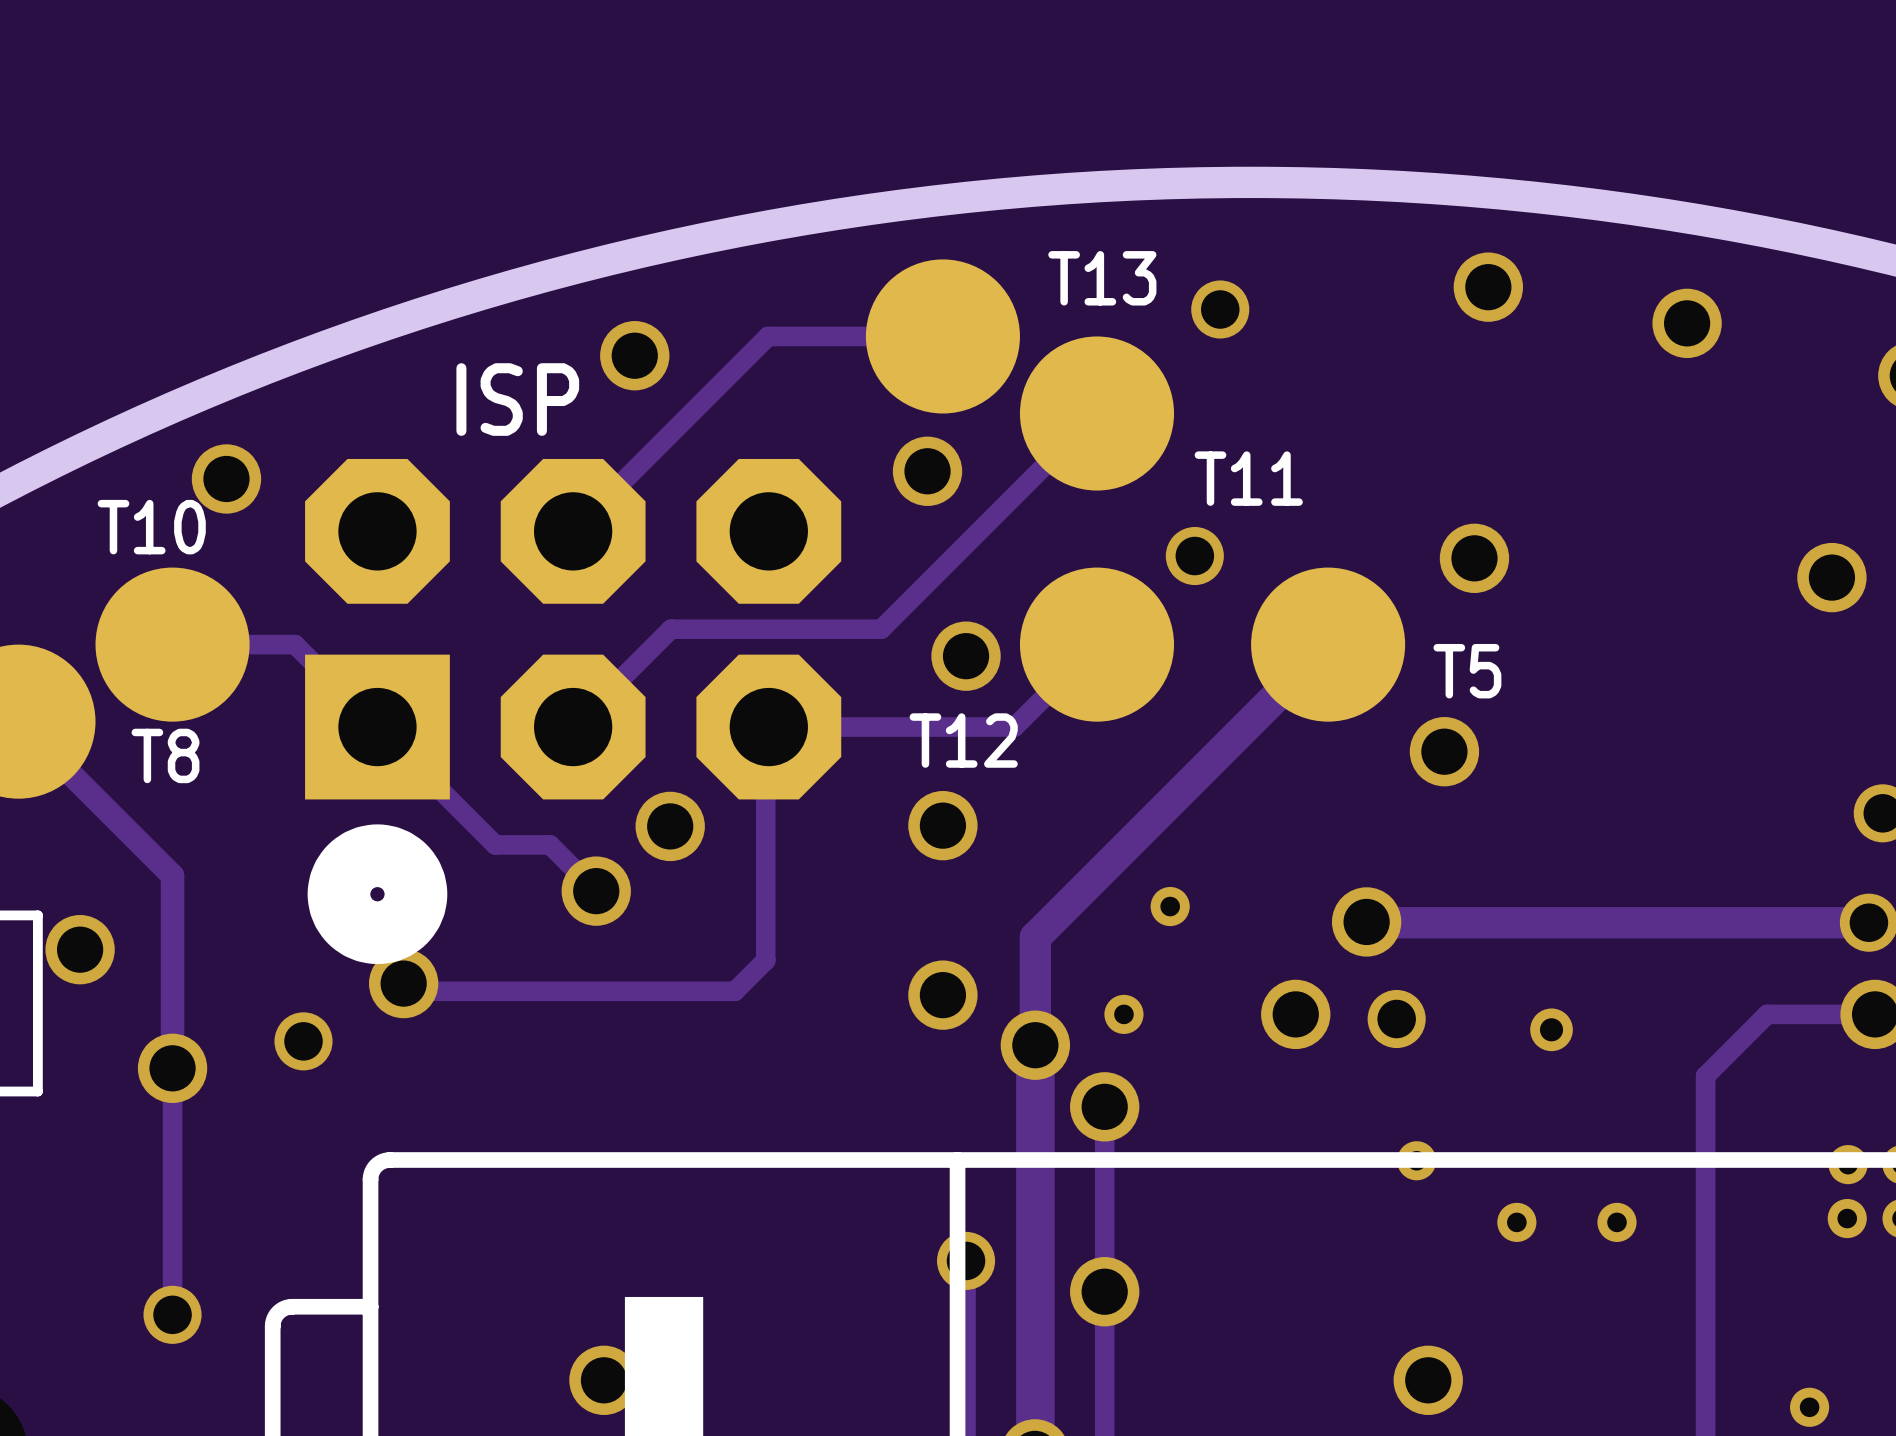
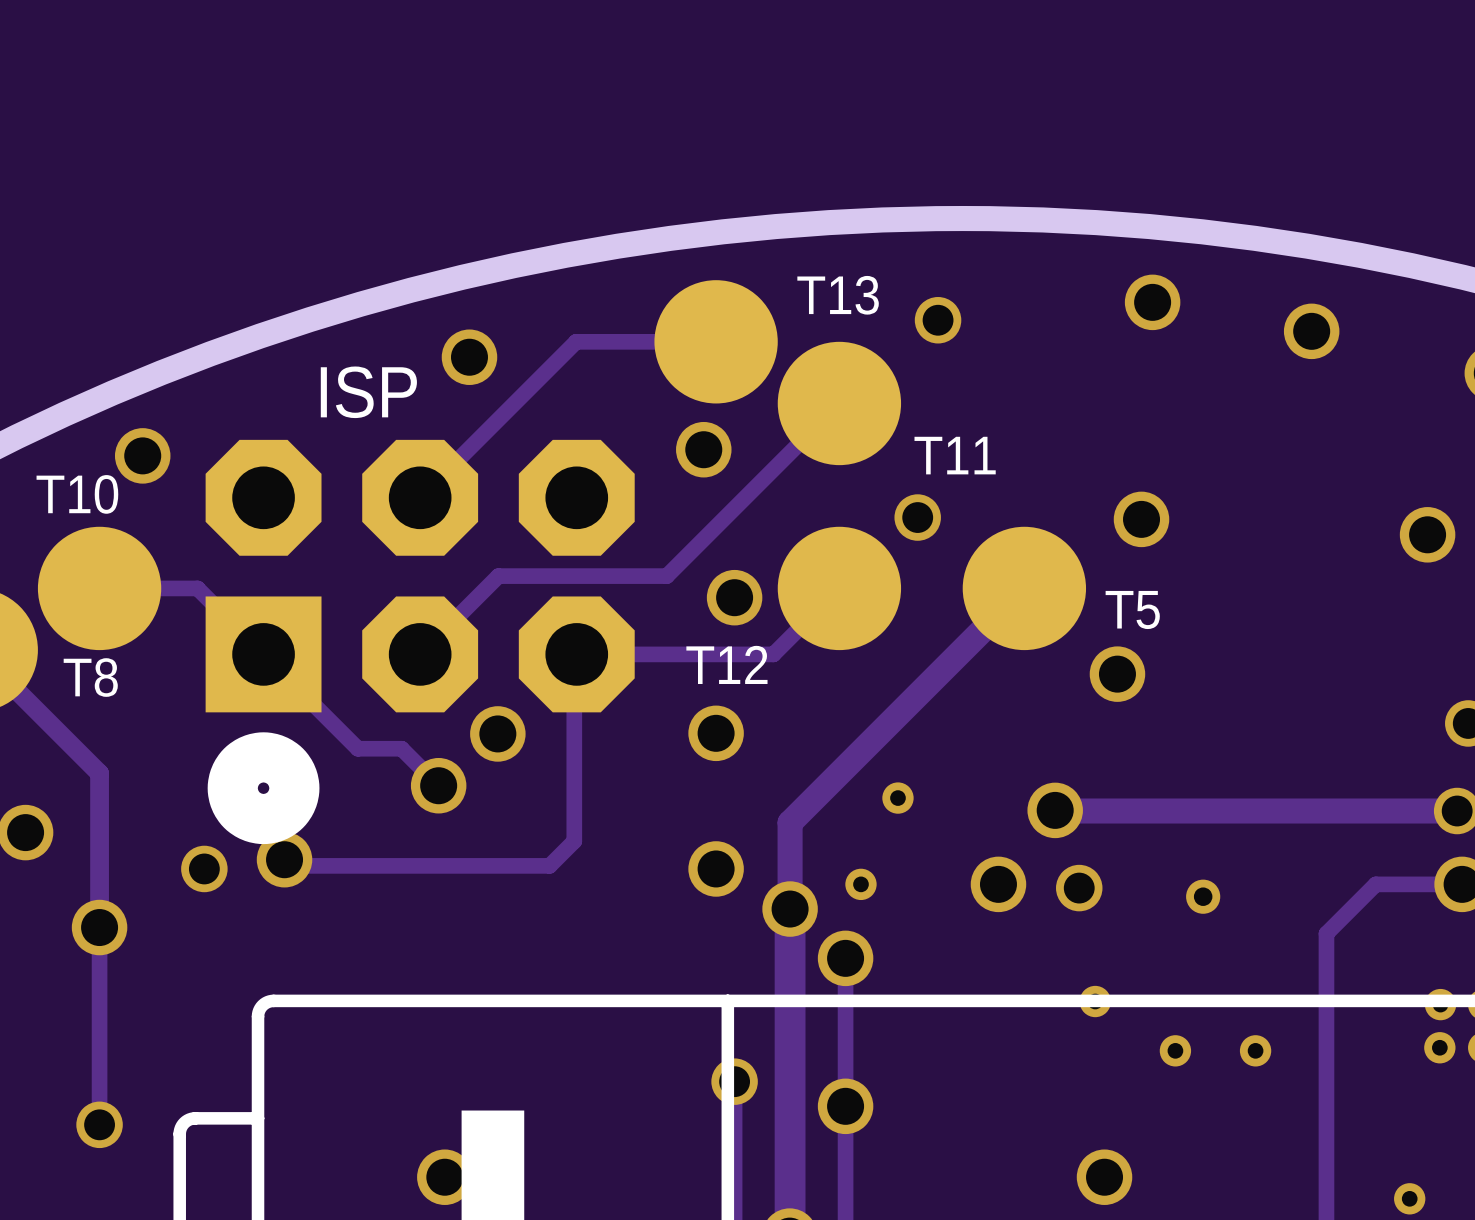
via position: (303, 1041) -> (204, 868)

